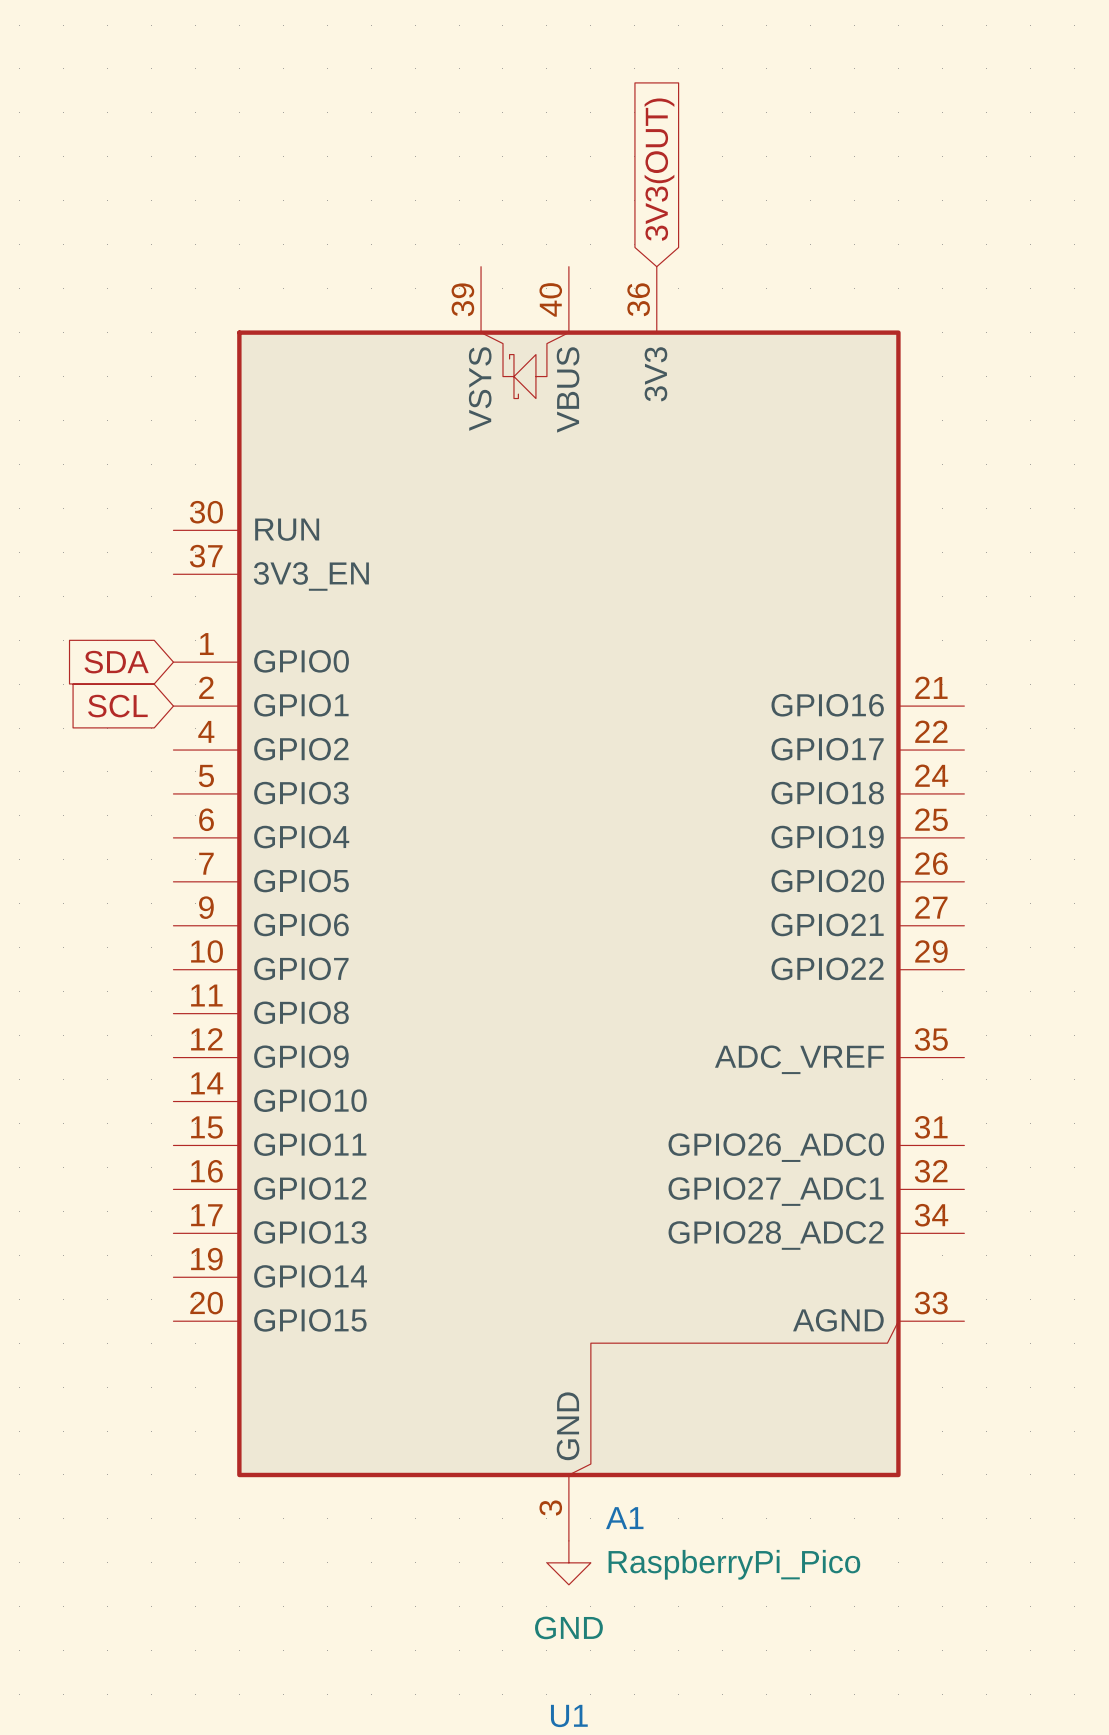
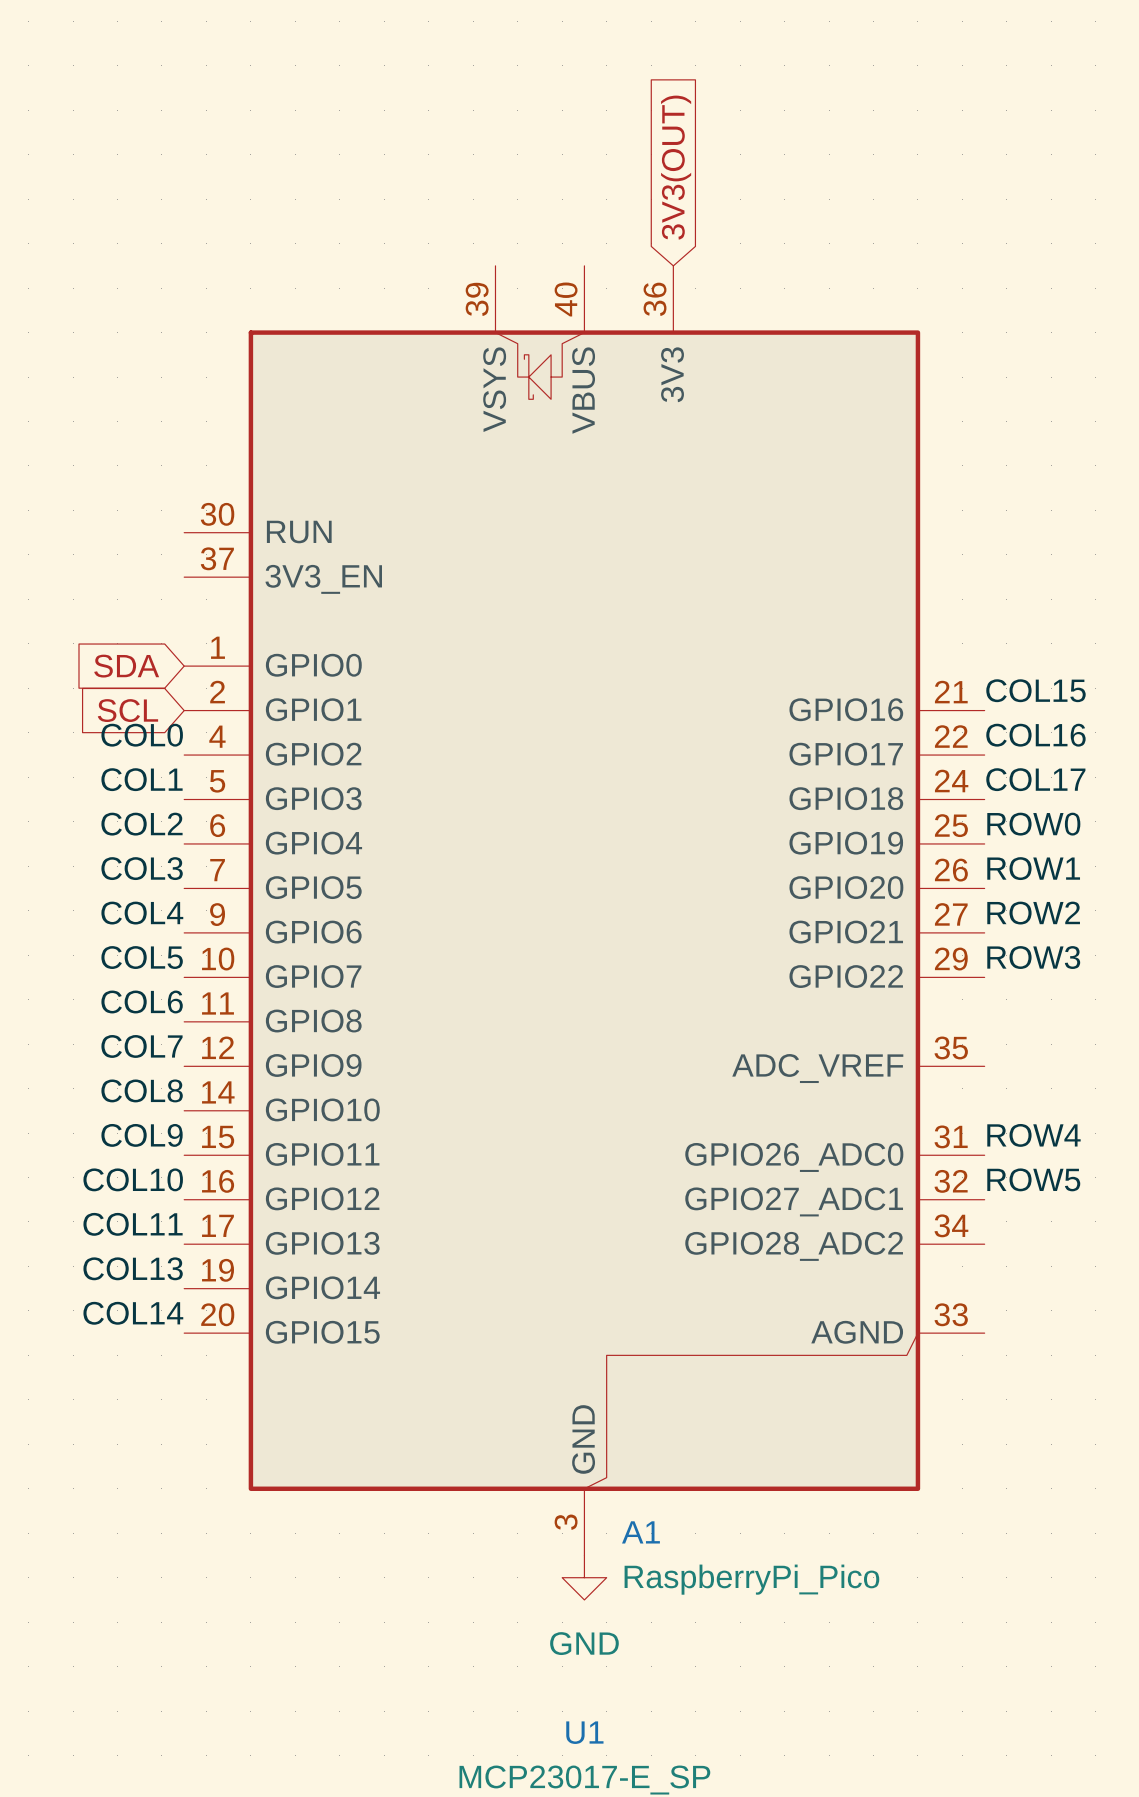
label: none -> COL15 (1035, 690)
label: none -> COL0 (142, 735)
label: none -> COL16 (1035, 735)
label: none -> COL1 (142, 779)
label: none -> COL17 (1035, 779)
label: none -> COL2 (142, 824)
label: none -> ROW0 (1033, 824)
label: none -> COL3 (142, 868)
label: none -> ROW1 (1033, 868)
label: none -> COL4 (142, 913)
label: none -> ROW2 (1033, 913)
label: none -> COL5 (142, 957)
label: none -> ROW3 (1033, 957)
label: none -> COL6 (142, 1002)
label: none -> COL7 (142, 1046)
label: none -> COL8 (142, 1090)
label: none -> COL9 (142, 1135)
label: none -> ROW4 (1033, 1135)
label: none -> COL10 (133, 1179)
label: none -> ROW5 (1033, 1179)
label: none -> COL11 (133, 1224)
label: none -> COL13 (133, 1268)
label: none -> COL14 (133, 1313)

